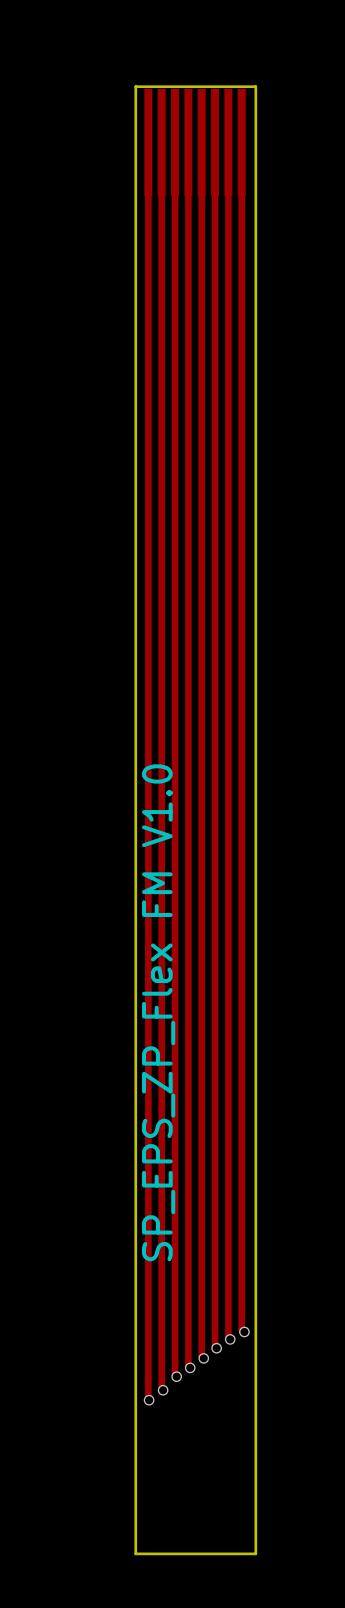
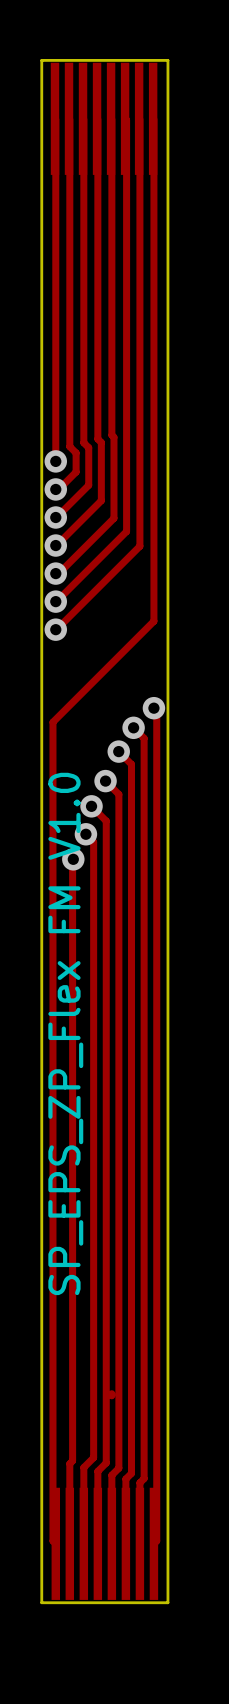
track: (148, 142) (149, 1400) -> (55, 119) (55, 461)
track: (161, 142) (163, 1390) -> (69, 119) (69, 446) (76, 452) (76, 472) (58, 489) (55, 489)
track: (175, 142) (175, 1375) (176, 1376) -> (83, 119) (83, 442) (88, 447) (88, 485) (55, 517)
track: (188, 142) (188, 1366) (190, 1367) -> (97, 119) (97, 439) (101, 442) (101, 500) (55, 545)
track: (201, 142) (201, 1356) (203, 1358) -> (111, 119) (111, 435) (113, 437) (113, 518) (58, 573) (55, 573)
track: (215, 142) (215, 1346) (216, 1348) -> (125, 119) (126, 531) (55, 601)
track: (228, 142) (228, 1337) (230, 1339) -> (139, 119) (139, 546) (55, 629)
track: (241, 142) (241, 1329) (244, 1331) -> (153, 119) (153, 621) (52, 722) (52, 1541) (55, 1543)
via: none -> (55, 461)
via: none -> (55, 489)
via: none -> (55, 517)
via: none -> (55, 545)
via: none -> (55, 573)
via: none -> (55, 601)
via: none -> (55, 629)
track: none -> (153, 708) (156, 710) (156, 1541) (153, 1543)
via: none -> (153, 708)
track: none -> (133, 727) (144, 738) (144, 1478) (139, 1482) (139, 1543)
via: none -> (133, 727)
track: none -> (118, 751) (131, 764) (131, 1473) (125, 1479) (125, 1543)
via: none -> (118, 751)
track: none -> (105, 781) (118, 794) (118, 1468) (111, 1475) (111, 1543)
via: none -> (105, 781)
track: none -> (91, 806) (106, 821) (106, 1462) (97, 1471) (97, 1543)
via: none -> (91, 806)
track: none -> (85, 834) (93, 841) (93, 1457) (83, 1467) (83, 1543)
via: none -> (85, 834)
track: none -> (73, 859) (72, 1460) (69, 1463) (69, 1543)
via: none -> (73, 859)
via: (244, 1331) -> none
via: (230, 1339) -> none
via: (216, 1348) -> none
via: (203, 1358) -> none
via: (190, 1367) -> none
via: (176, 1376) -> none
via: (163, 1390) -> none
via: (149, 1400) -> none
part: none -> (104, 1543)

